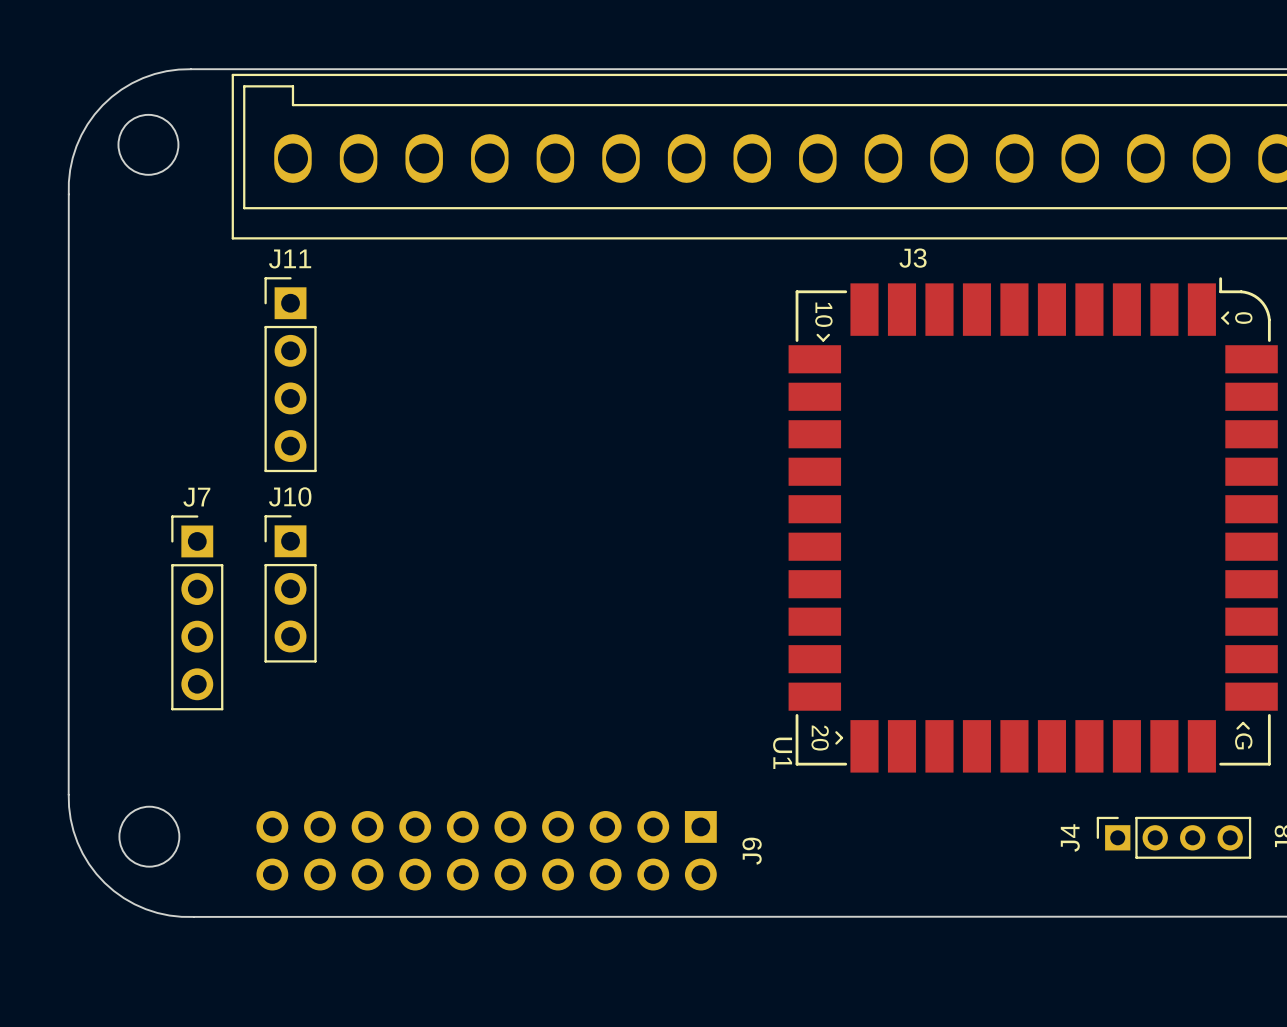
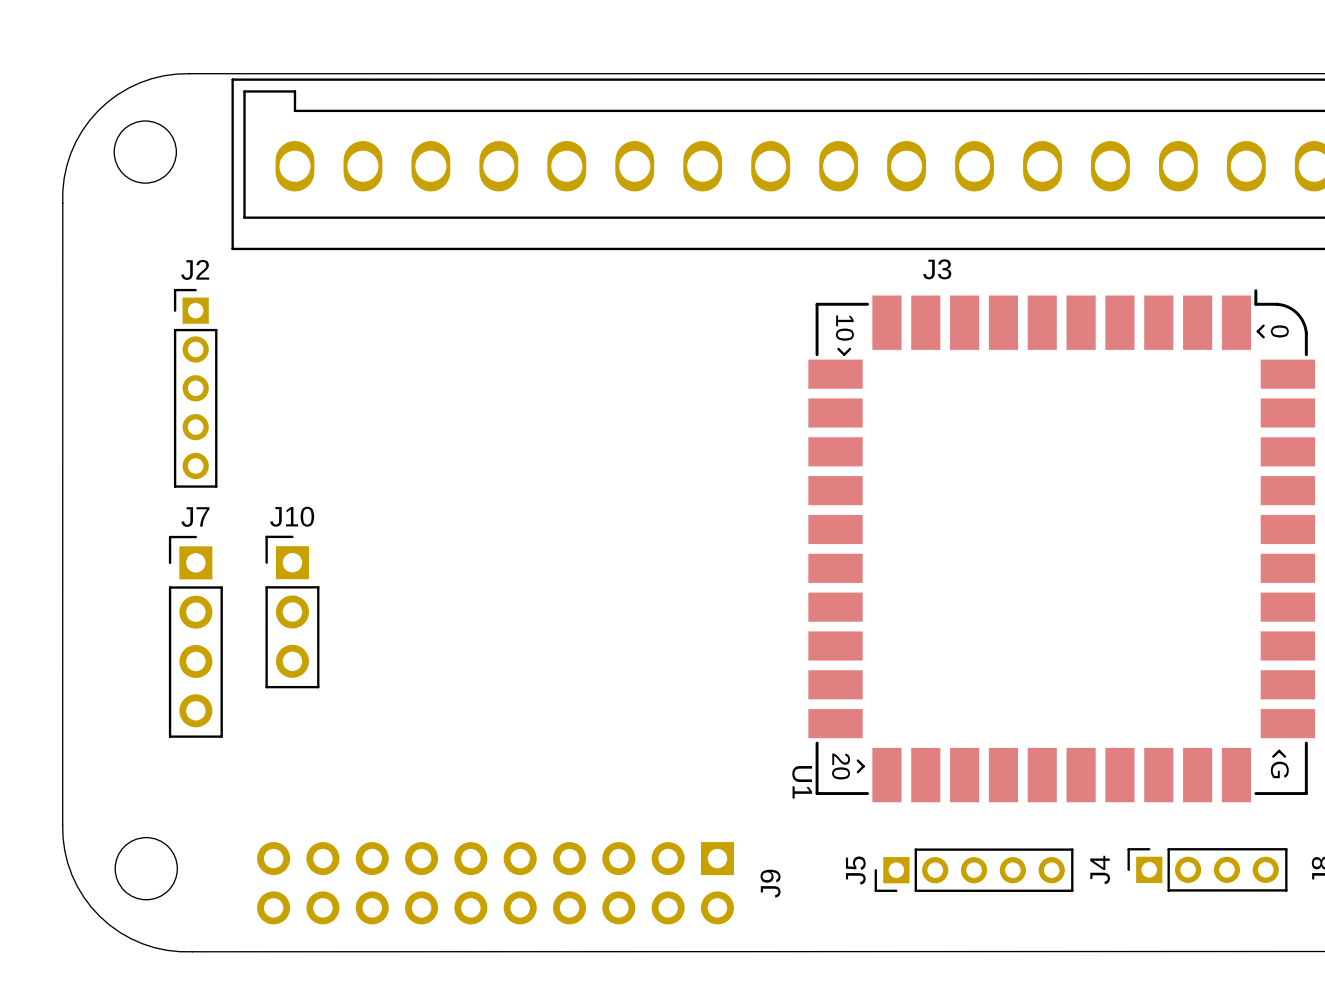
J2: none -> (195, 388)
J11: (290, 374) -> none
J5: none -> (974, 870)

